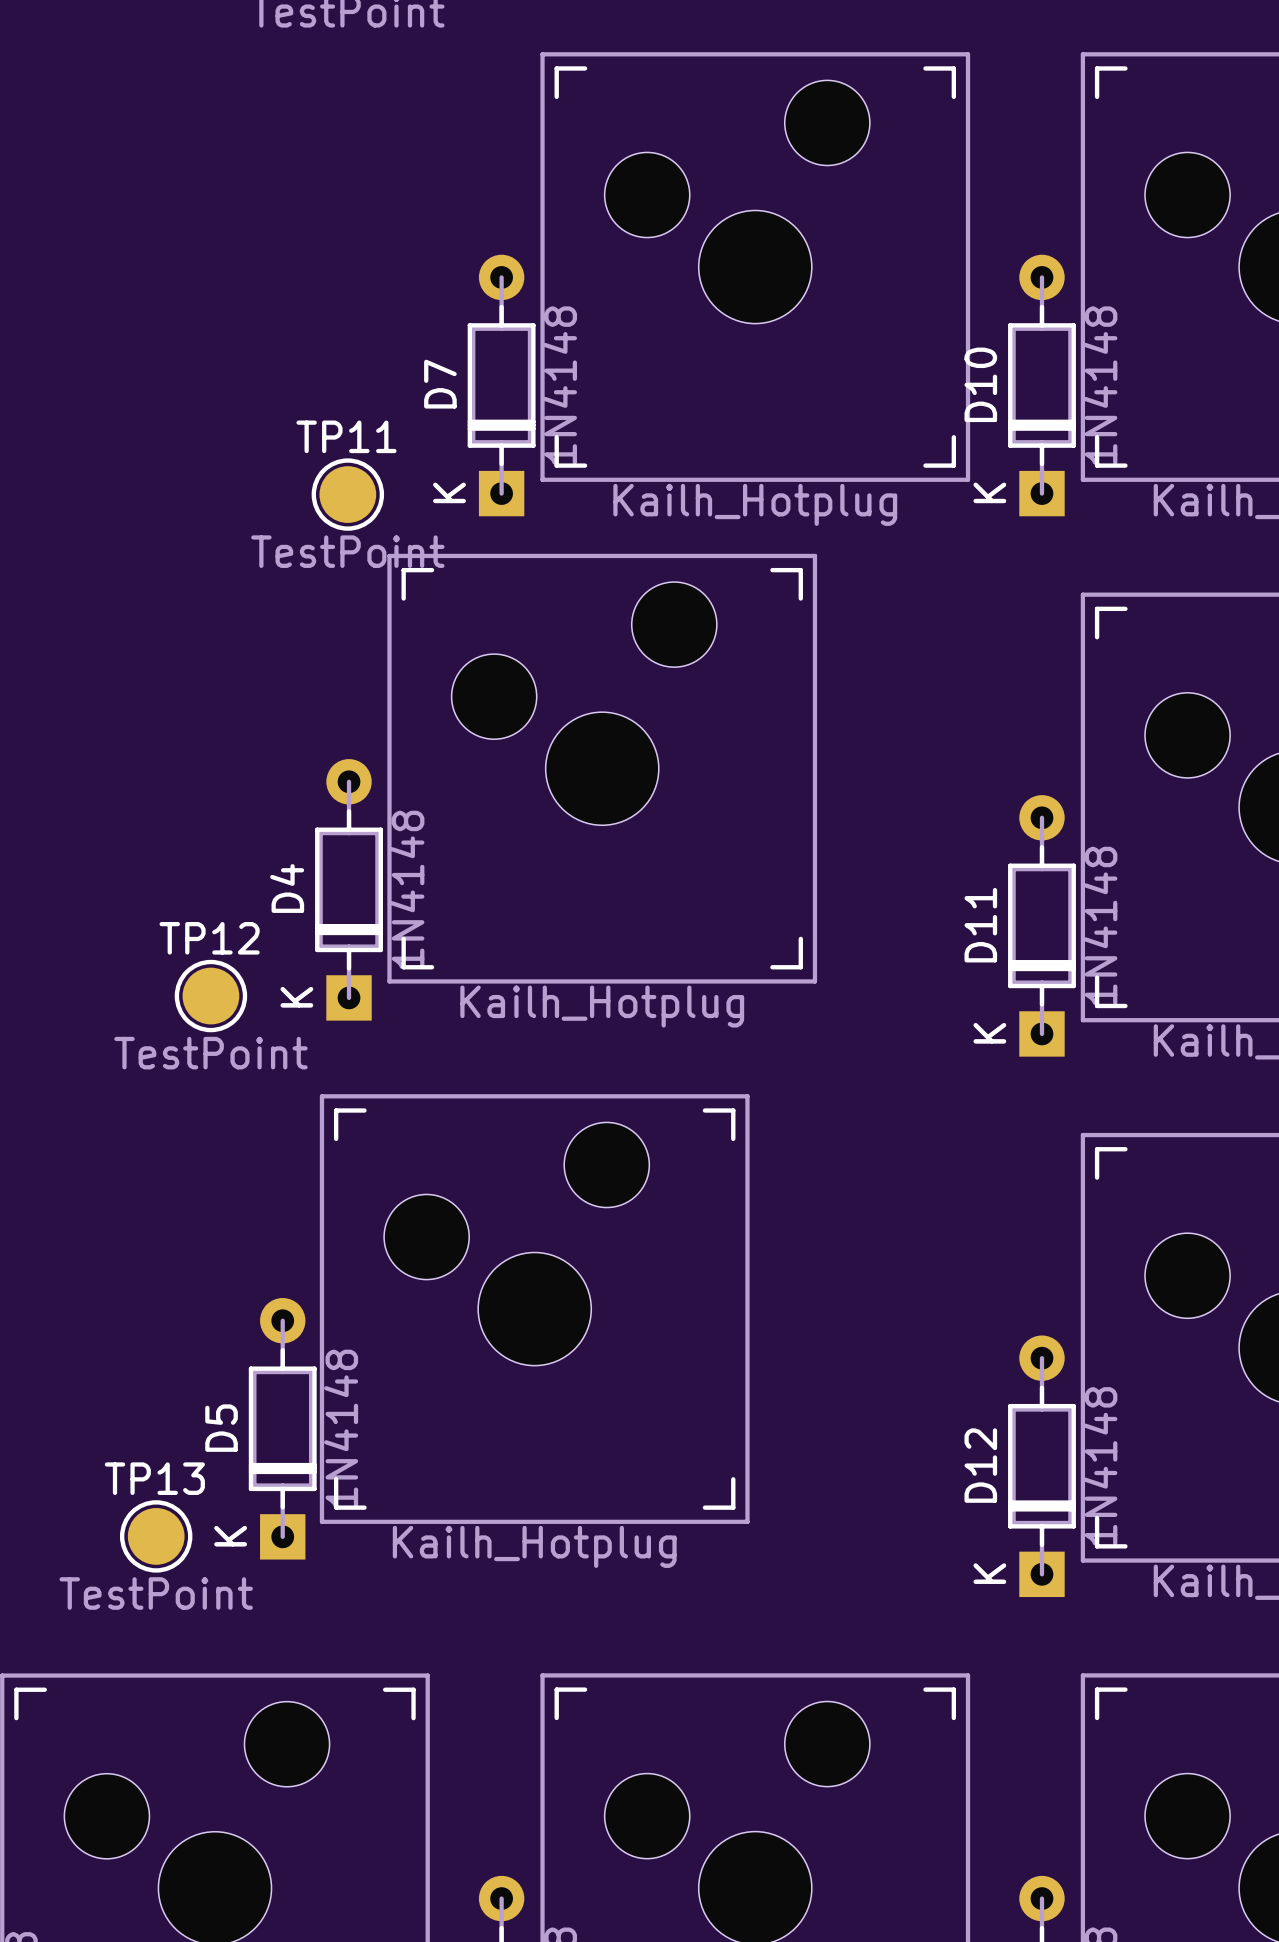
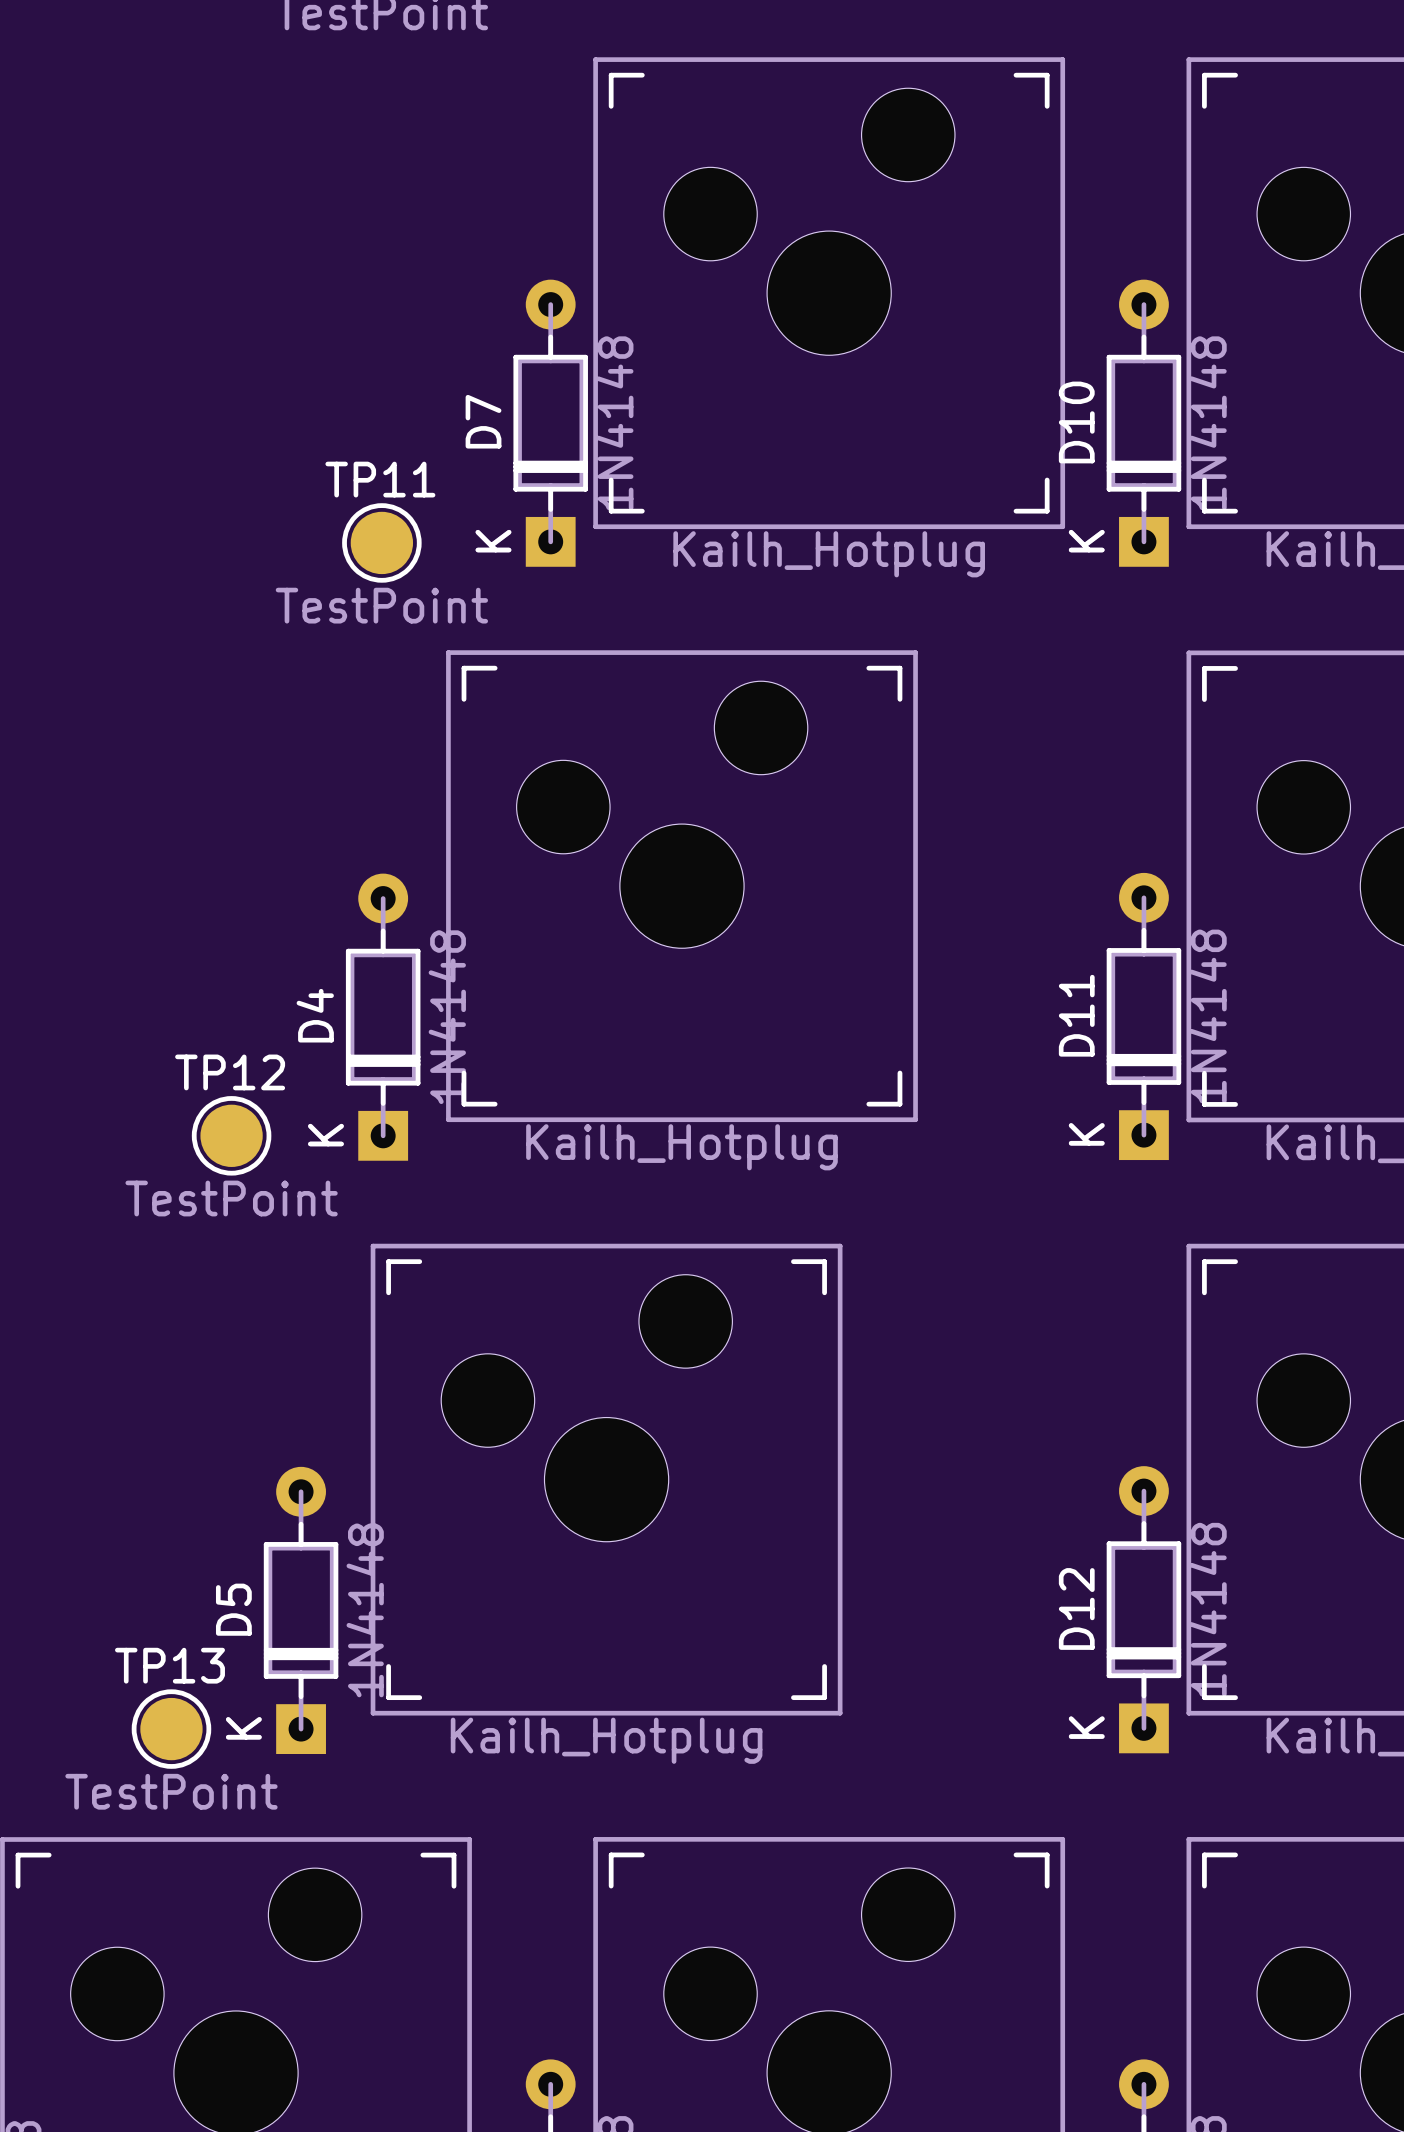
part position: (602, 768) -> (681, 886)
D4 position: (349, 889) -> (383, 1017)
TP12 position: (210, 996) -> (231, 1135)
part position: (534, 1309) -> (606, 1479)
D5 position: (282, 1428) -> (301, 1610)
TP13 position: (156, 1536) -> (171, 1729)

